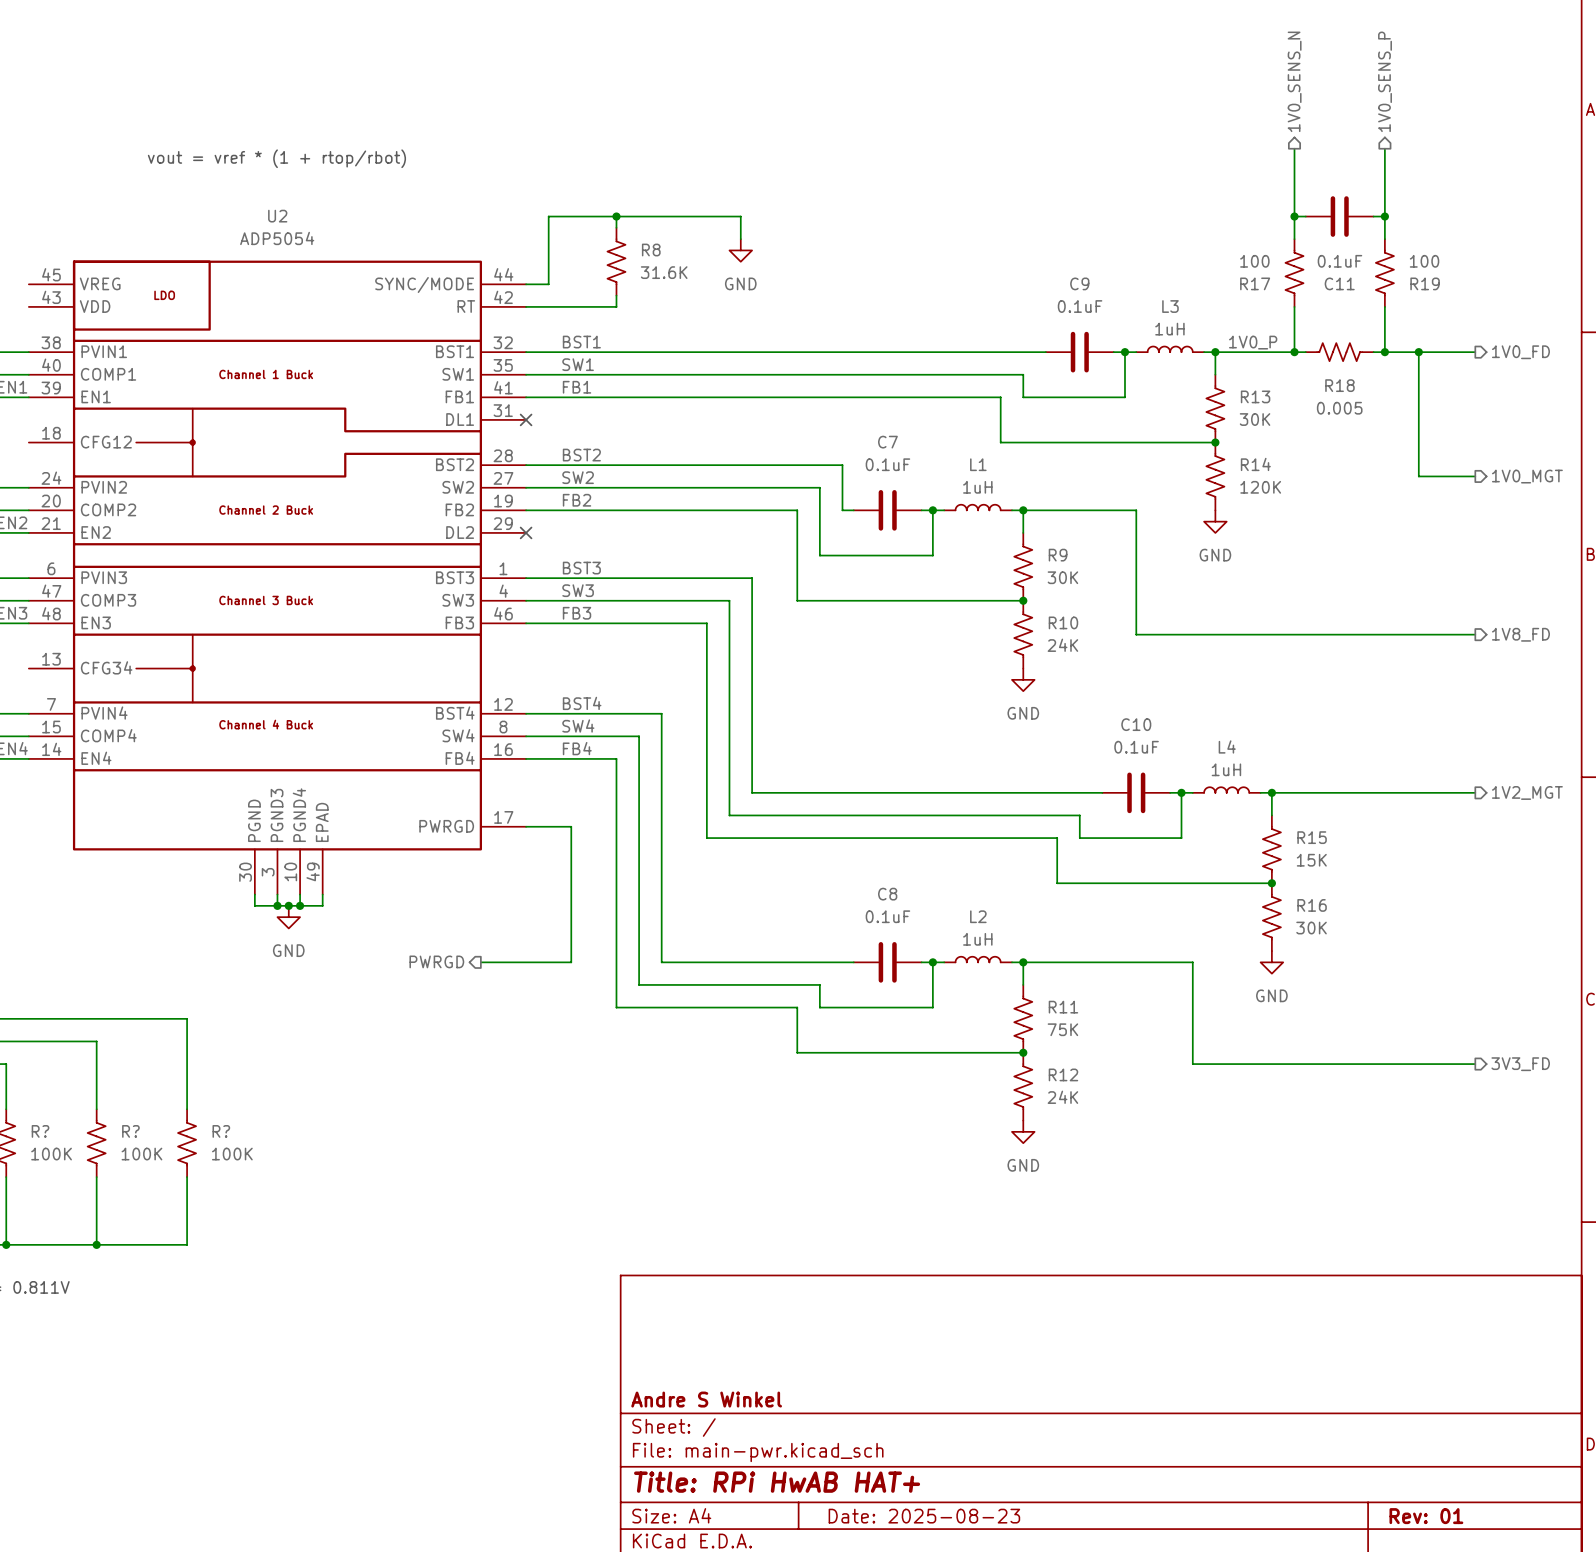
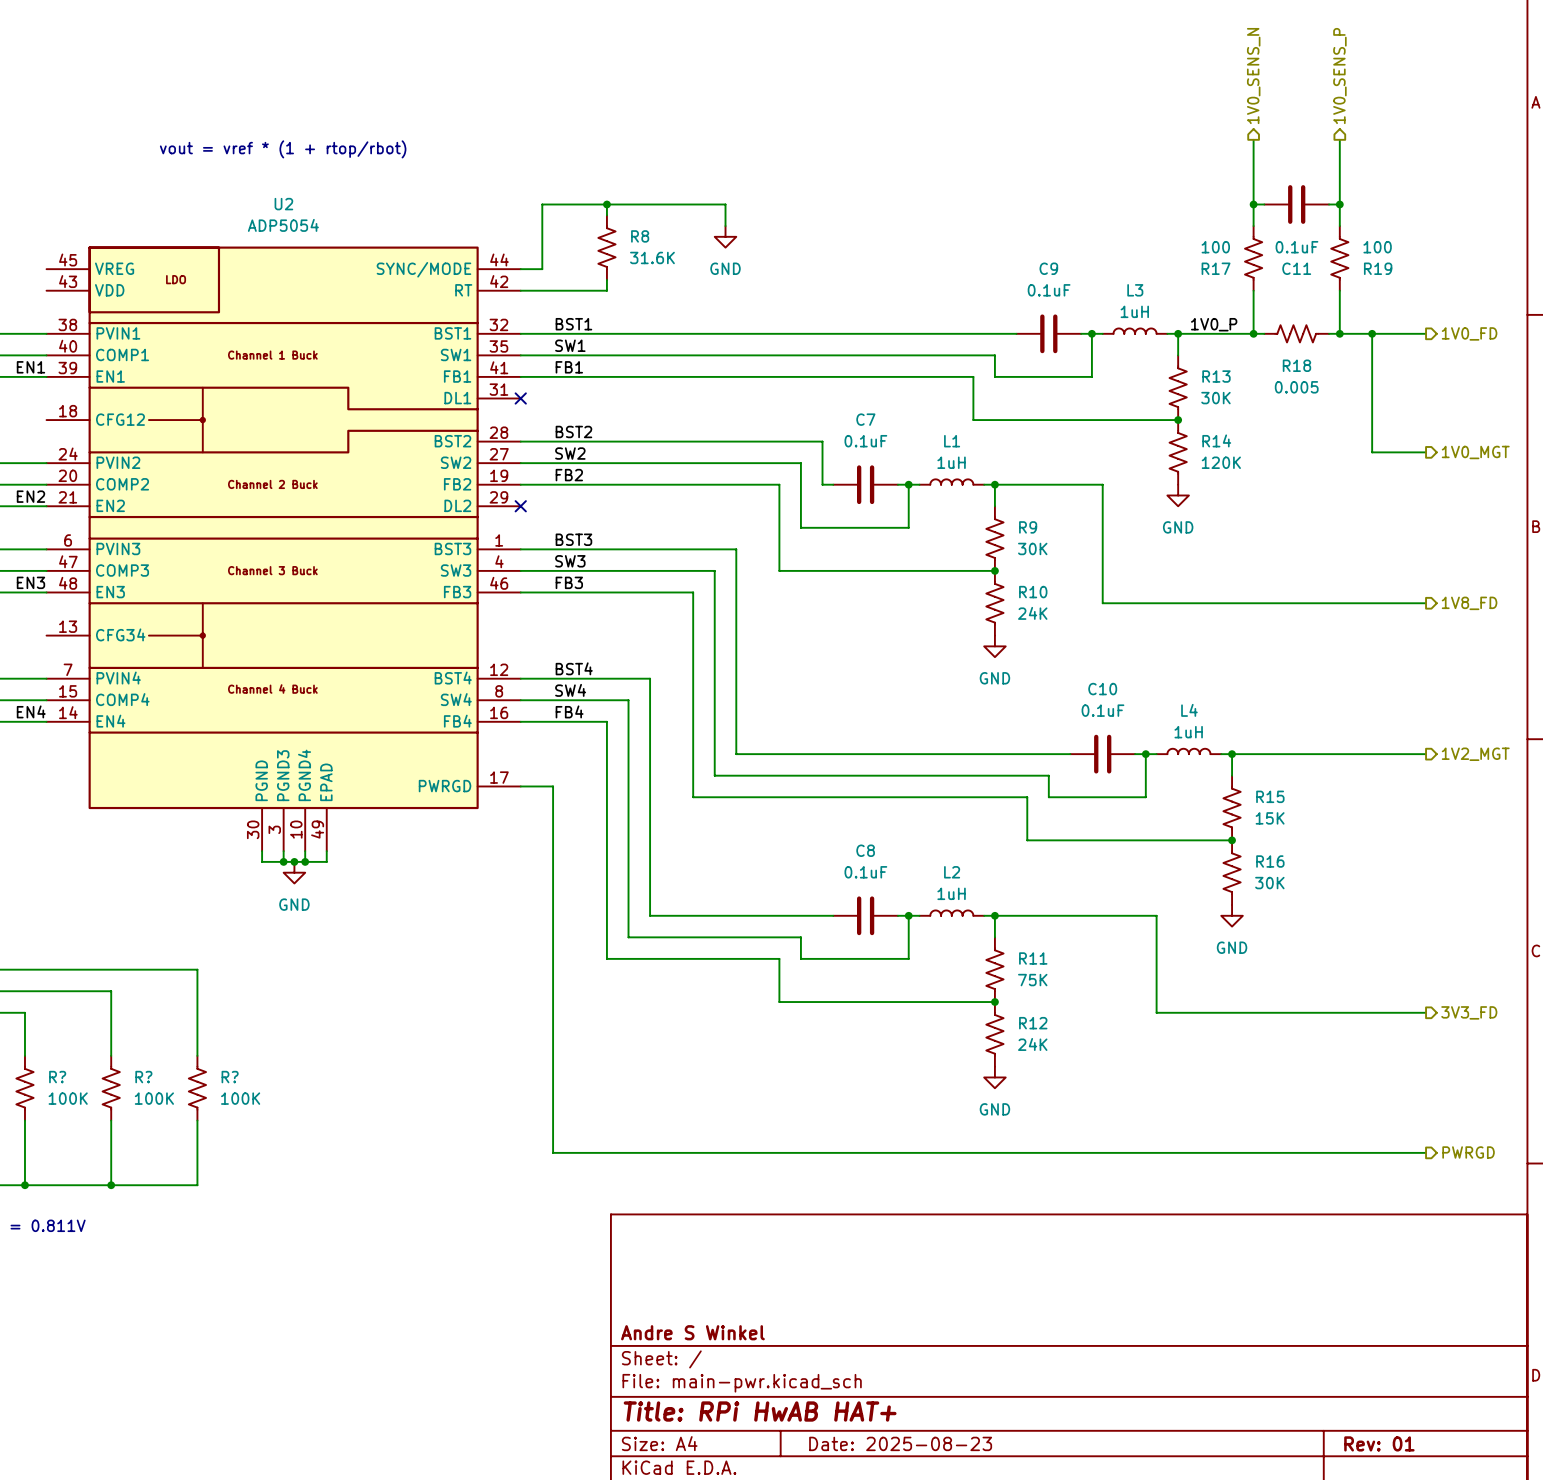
wire: (559, 826) (571, 826) (571, 962) (480, 962) -> (553, 786) (553, 1152) (1426, 1152)
hierarchical label: PWRGD (436, 961) -> none
hierarchical label: none -> PWRGD (1468, 1152)

